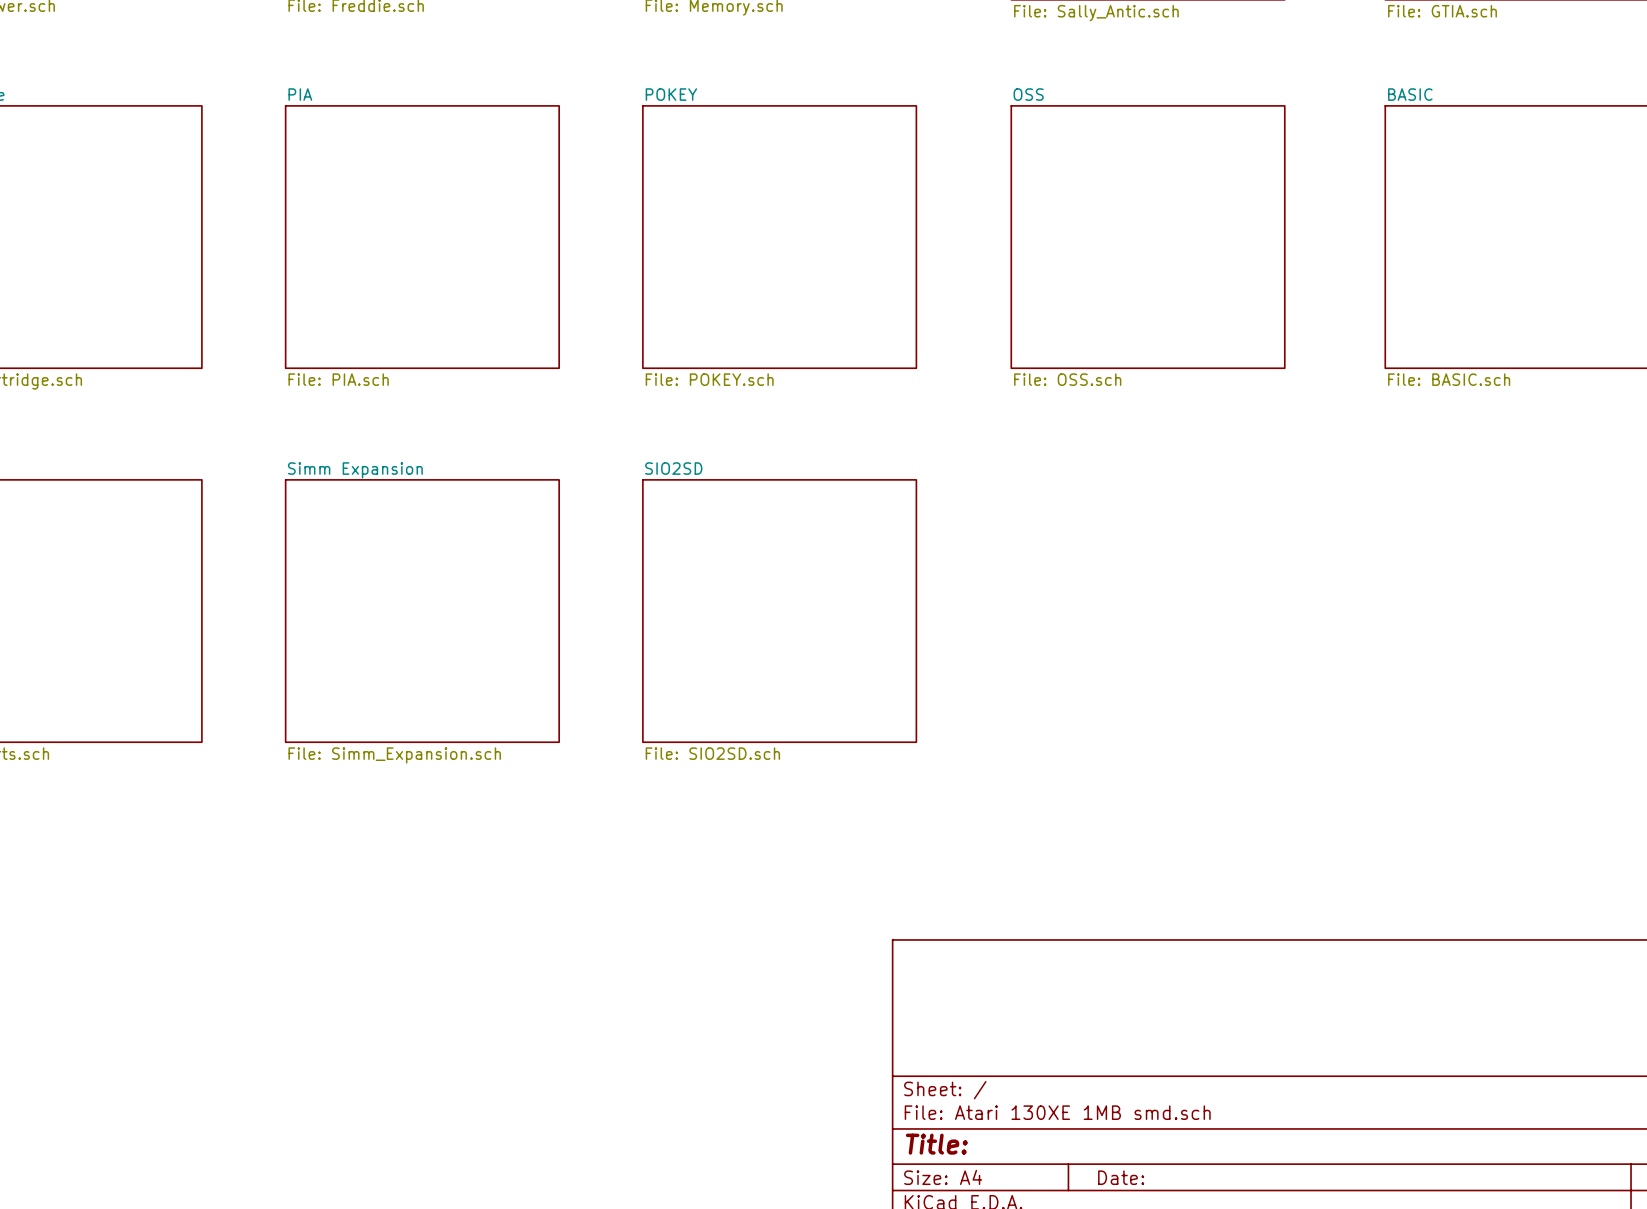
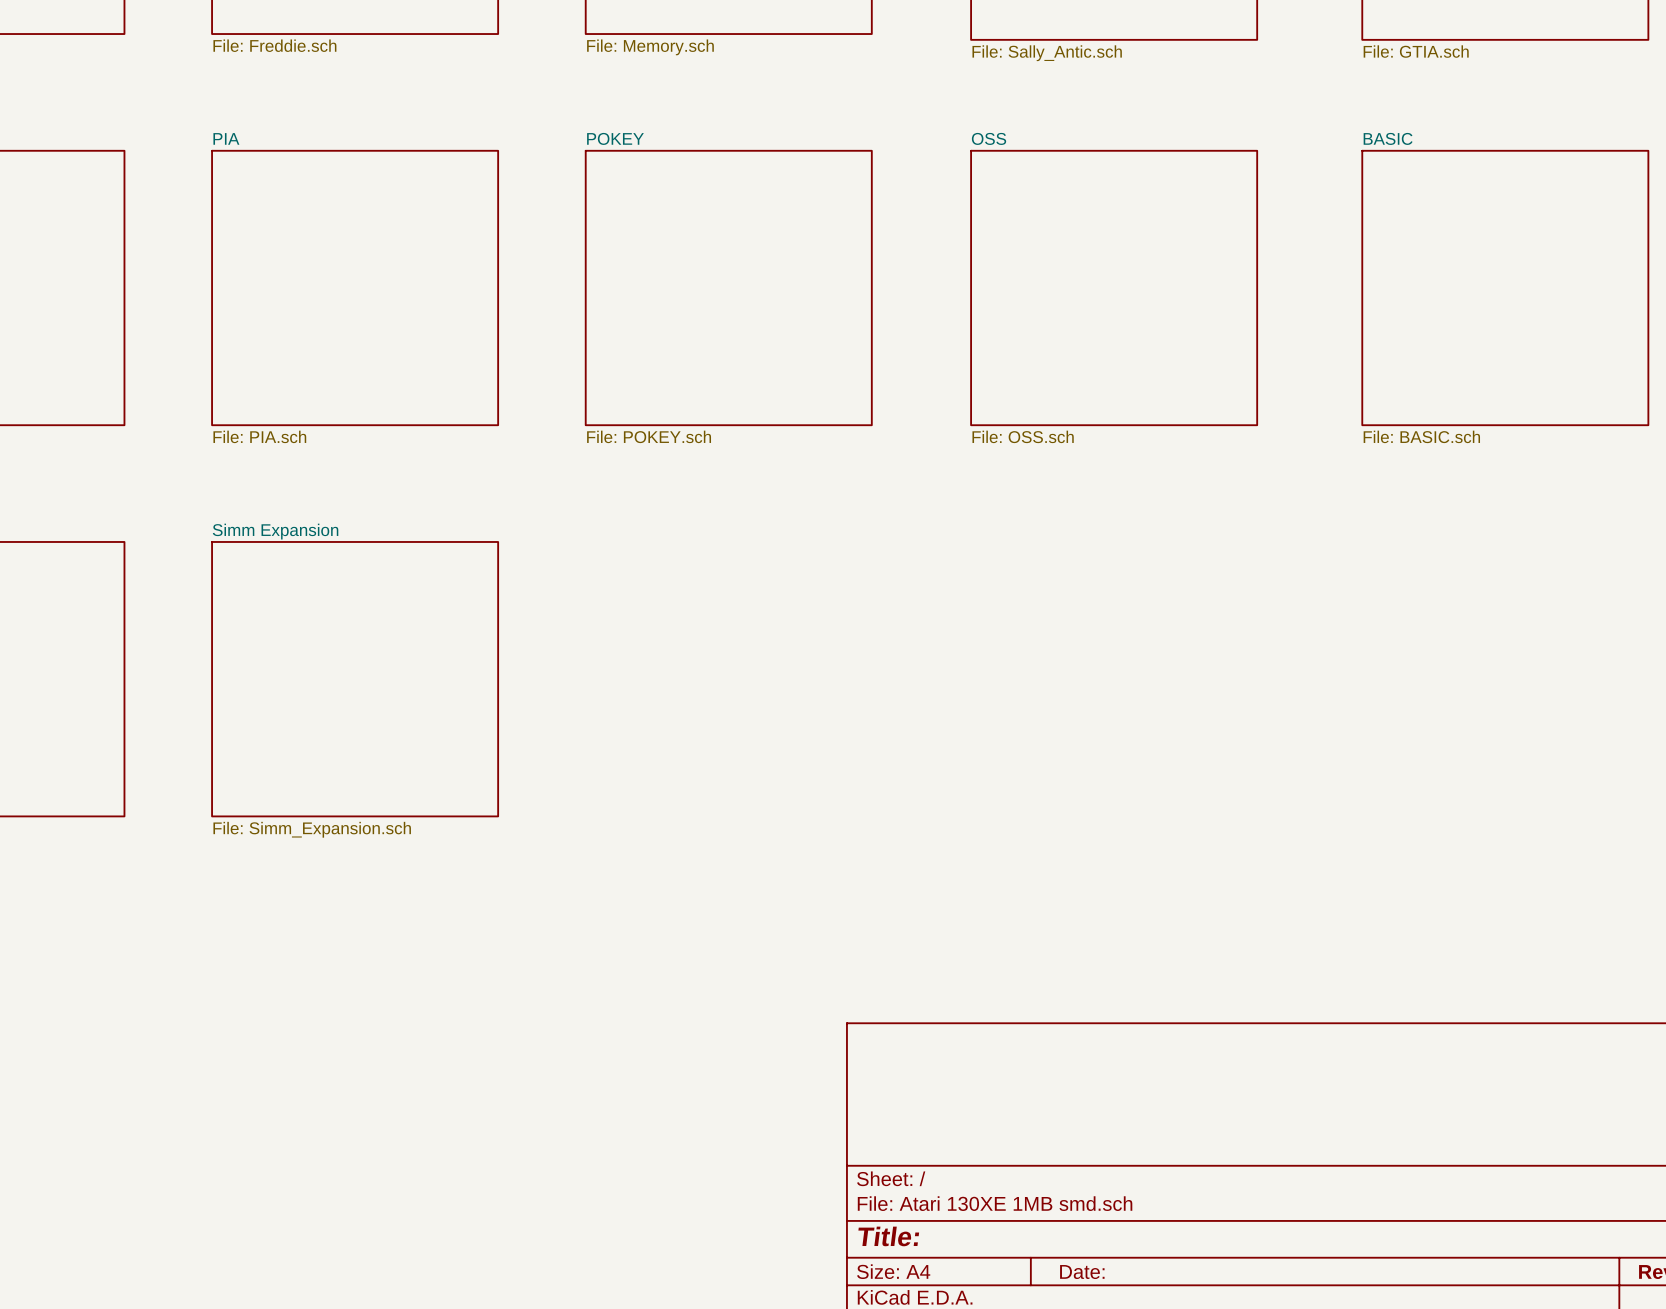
sheet SIO2SD: File: SIO2SD.sch (779, 611) -> none

